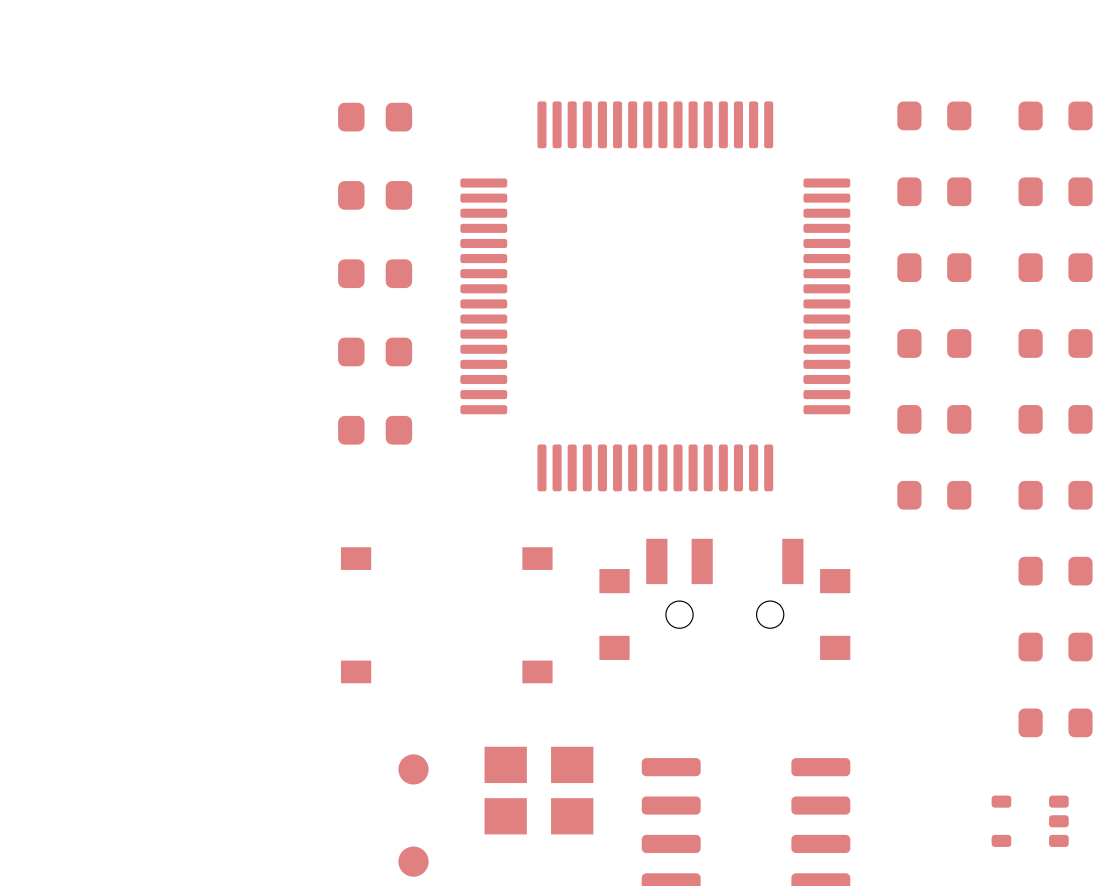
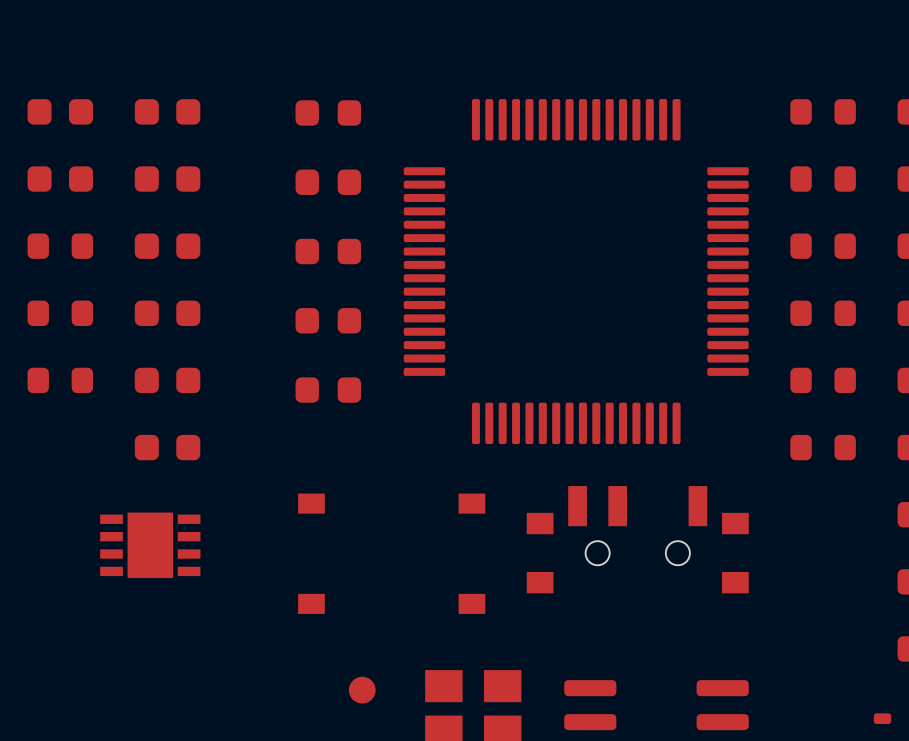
part: none -> (60, 111)
part: none -> (167, 111)
part: none -> (60, 179)
part: none -> (167, 179)
part: none -> (60, 246)
part: none -> (167, 246)
part: none -> (60, 313)
part: none -> (167, 313)
part: none -> (60, 380)
part: none -> (167, 380)
part: none -> (167, 447)
part: none -> (150, 545)

